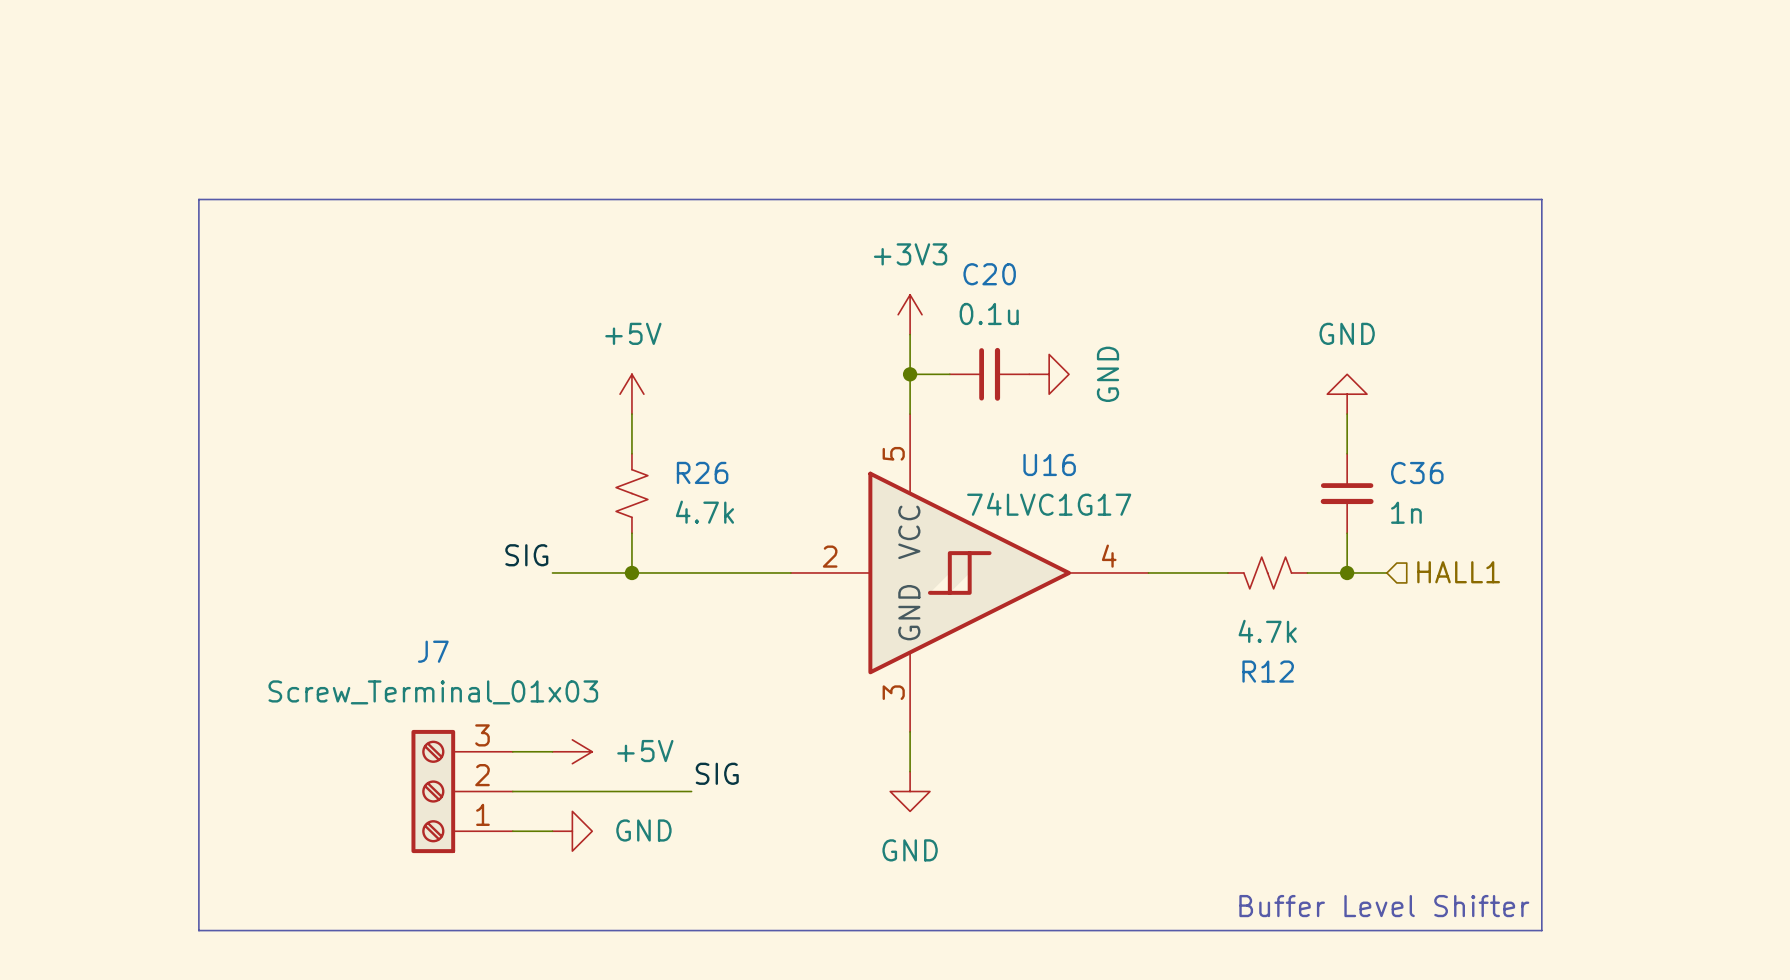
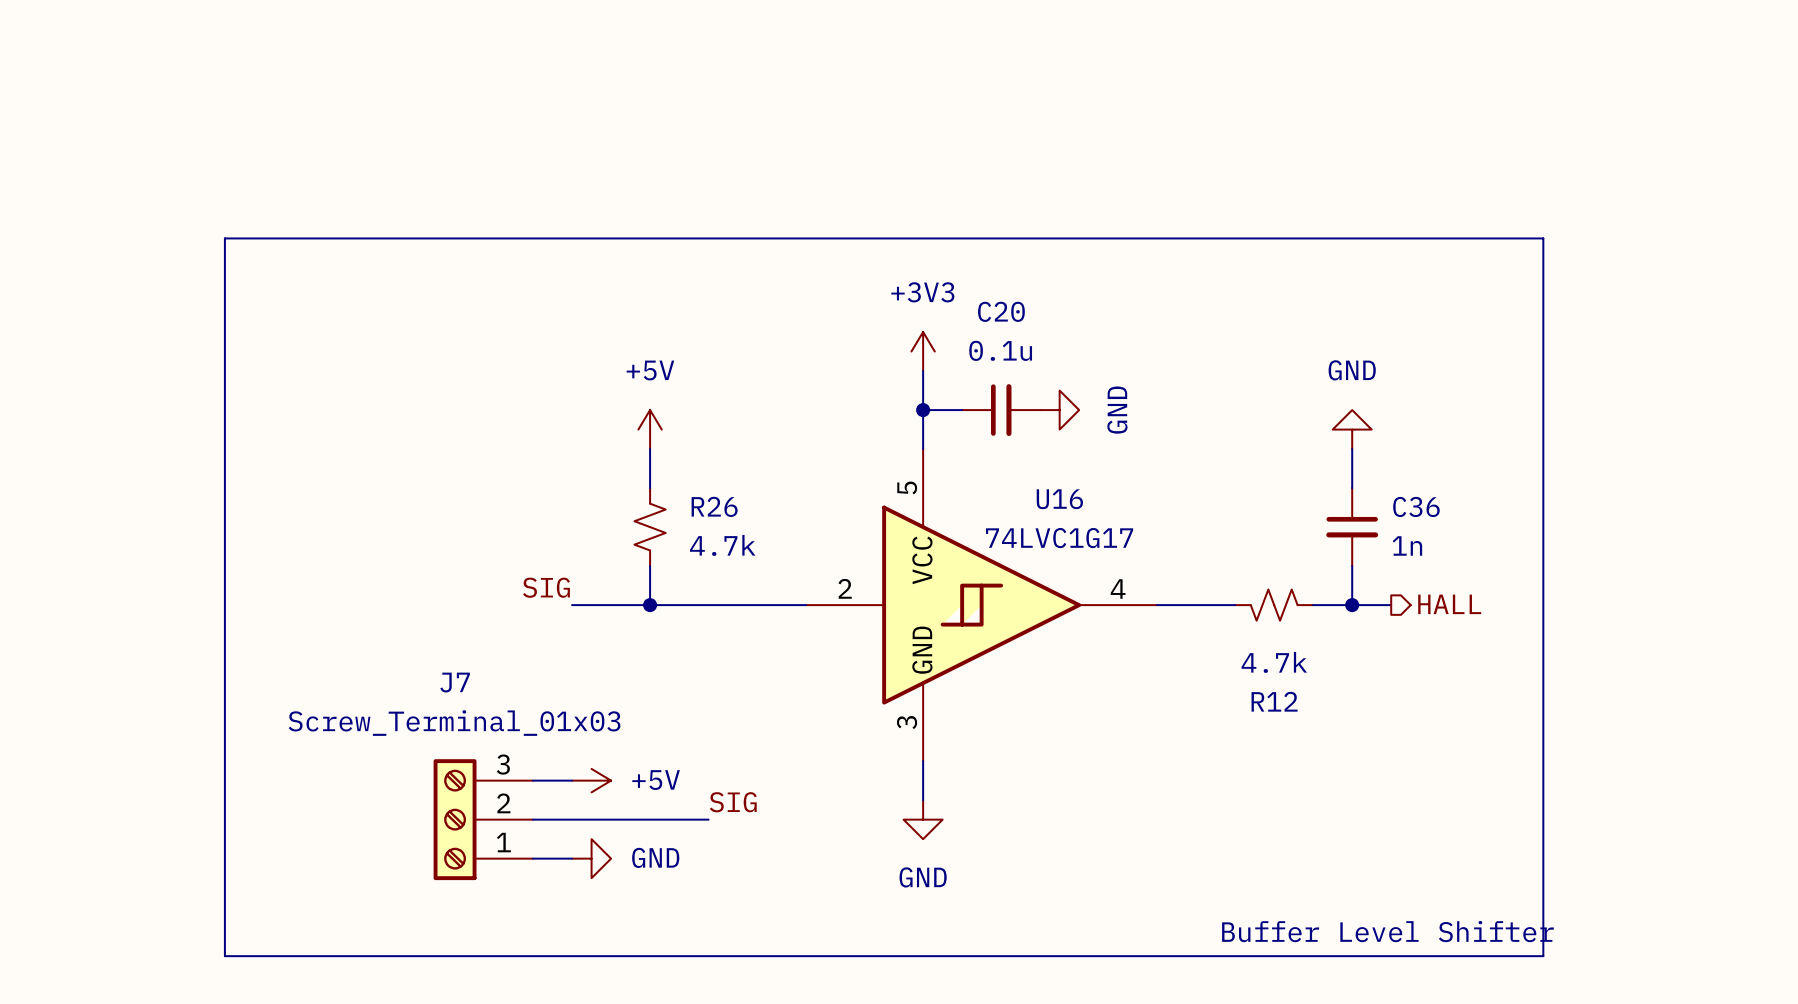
hierarchical label shape: input (1458, 572) -> output (1449, 604)
hierarchical label: HALL1 (1458, 572) -> HALL (1449, 604)

